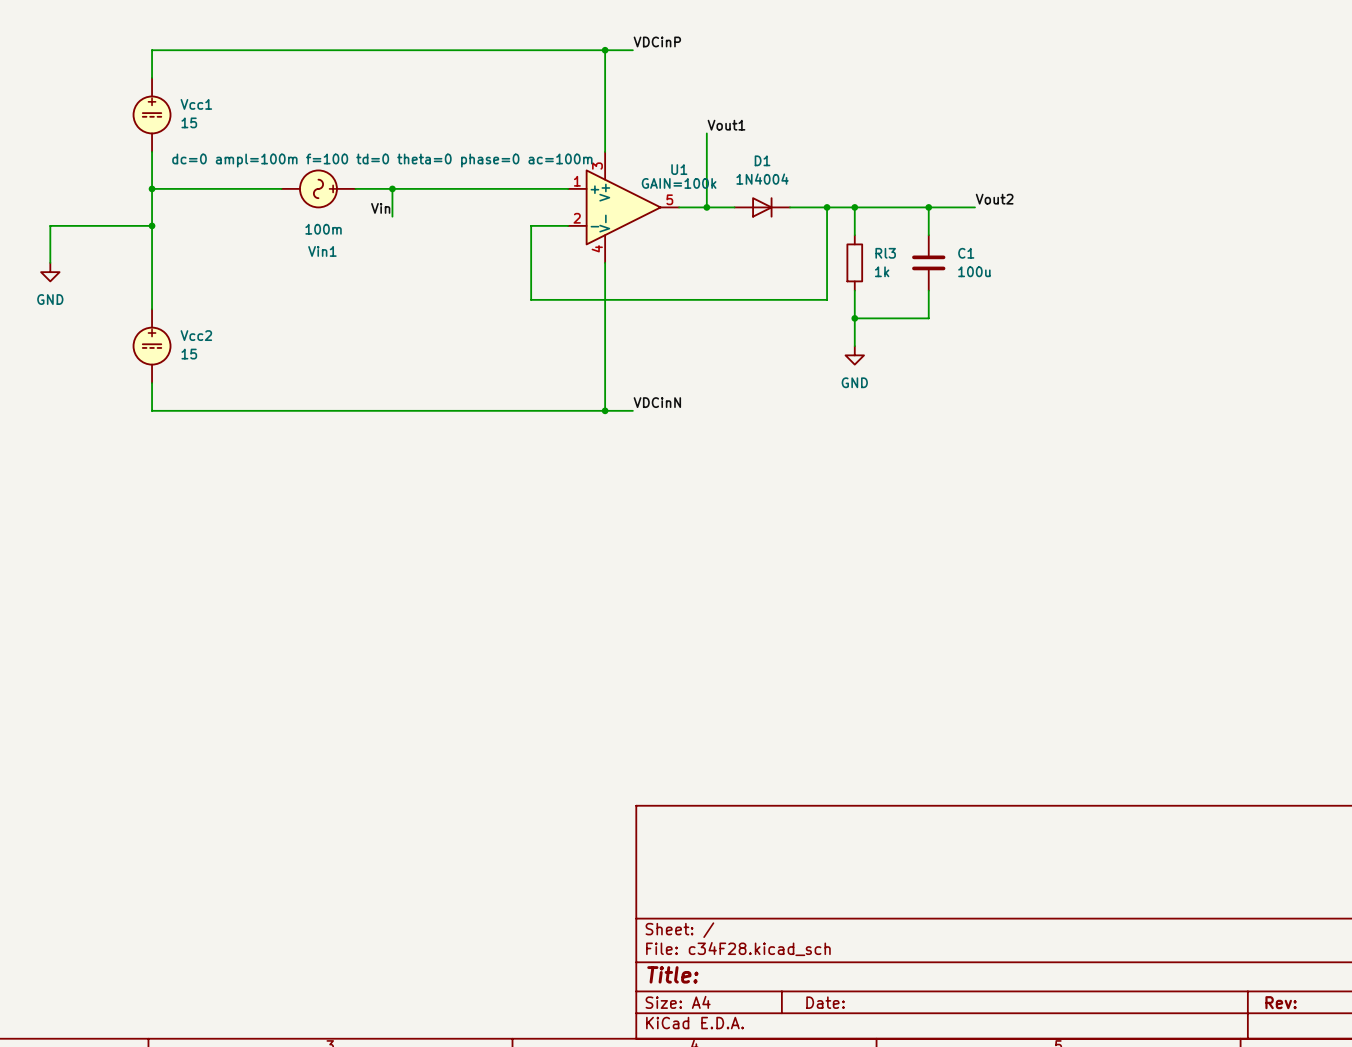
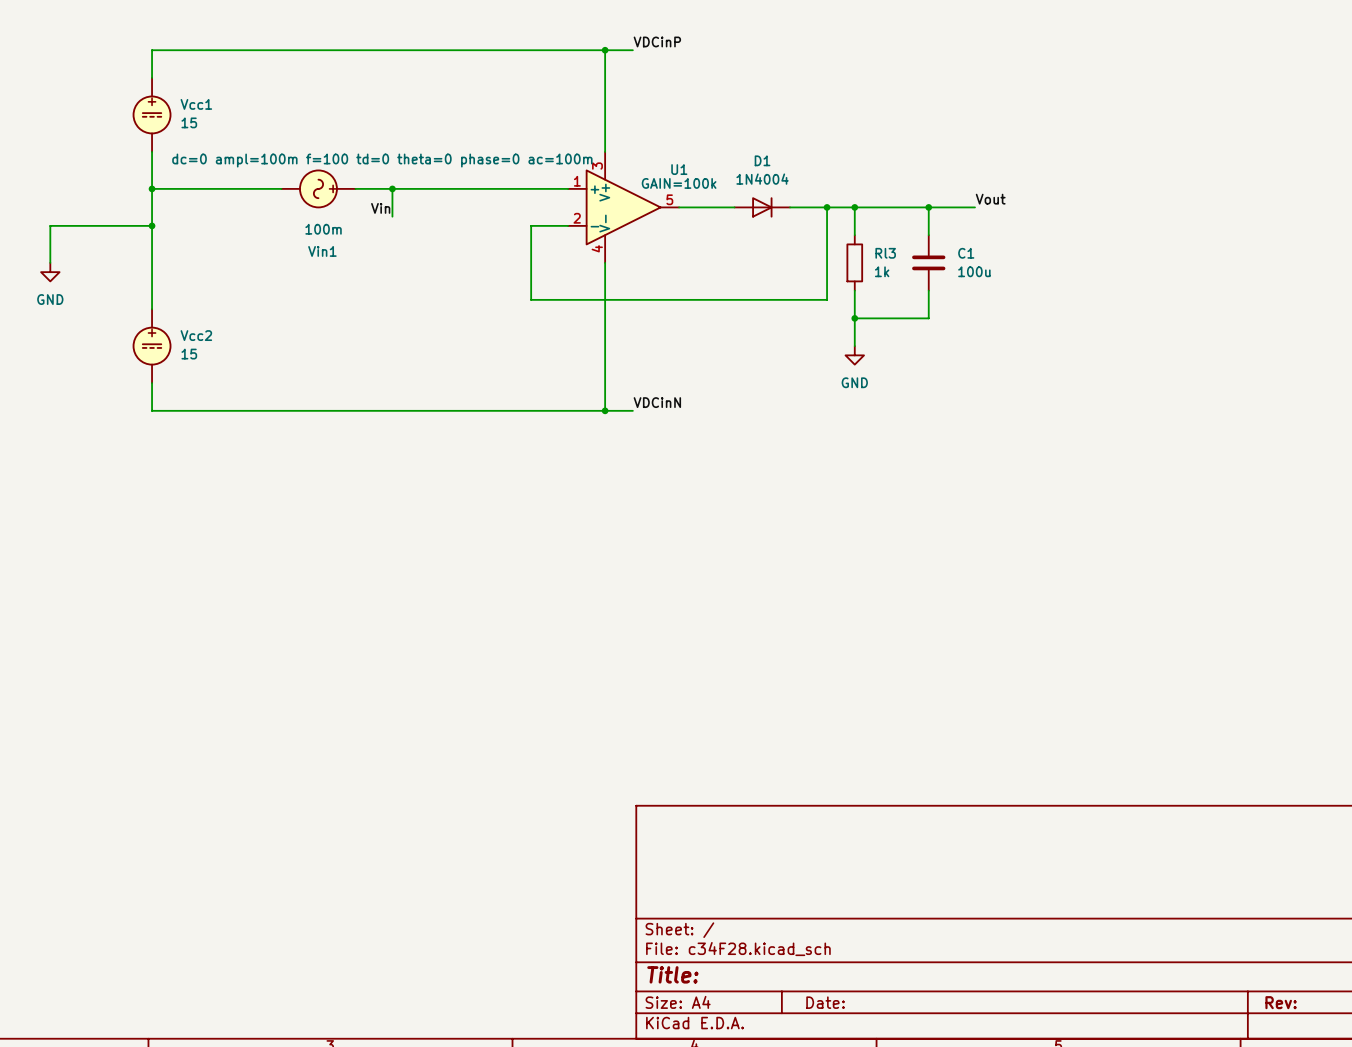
label: Vout1 (726, 125) -> none
wire: (706, 133) (706, 207) -> none
label: Vout2 (994, 199) -> Vout (990, 199)
junction: (706, 207) -> none

